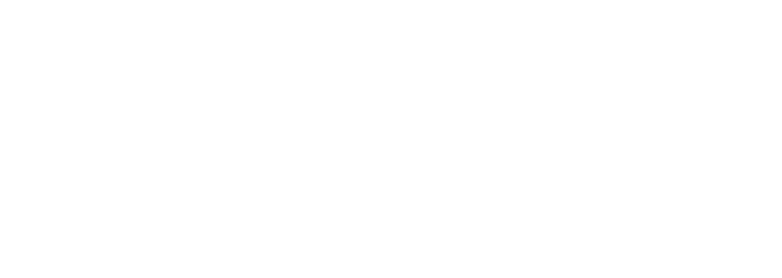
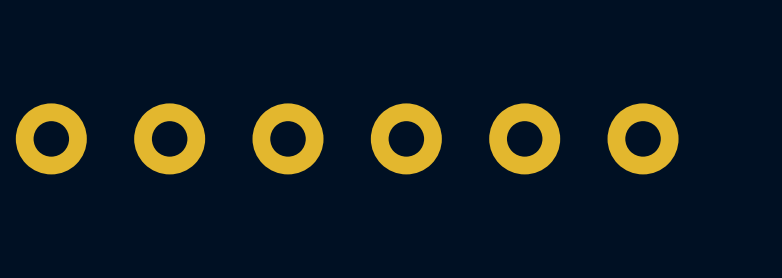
part: none -> (347, 138)

